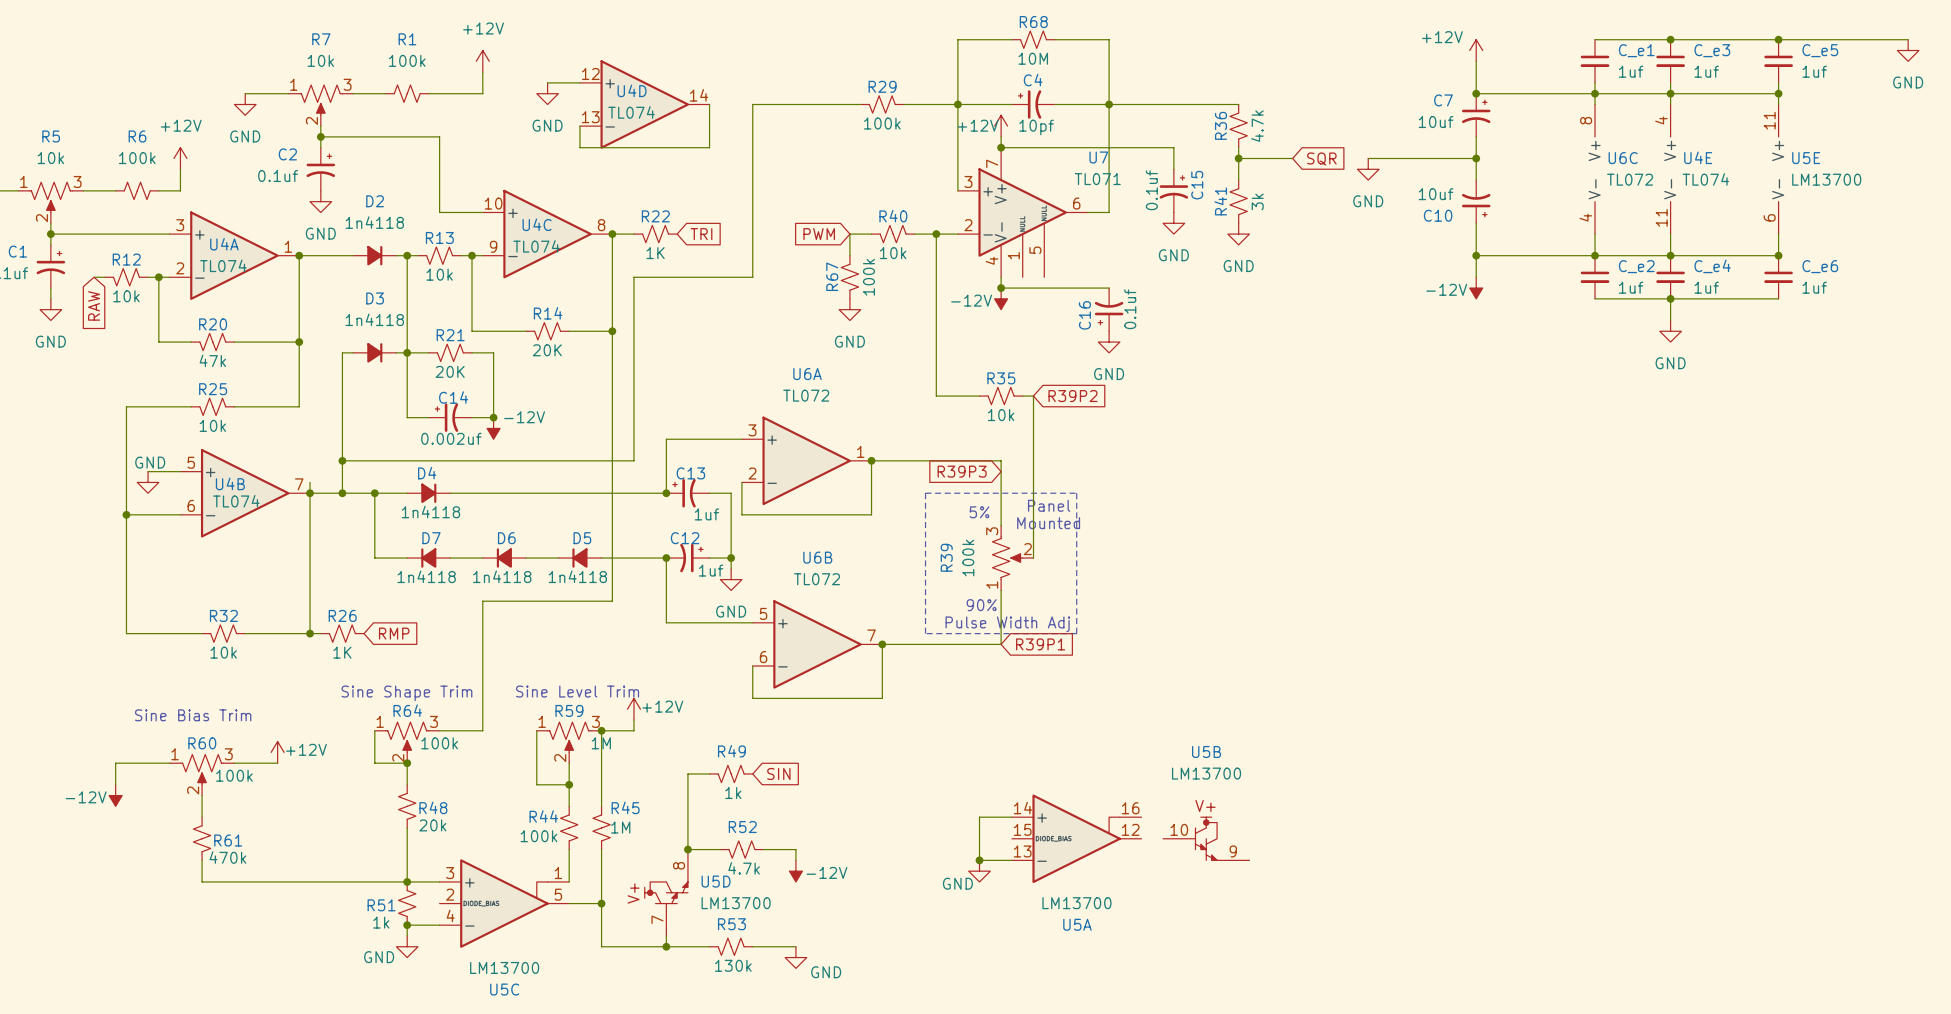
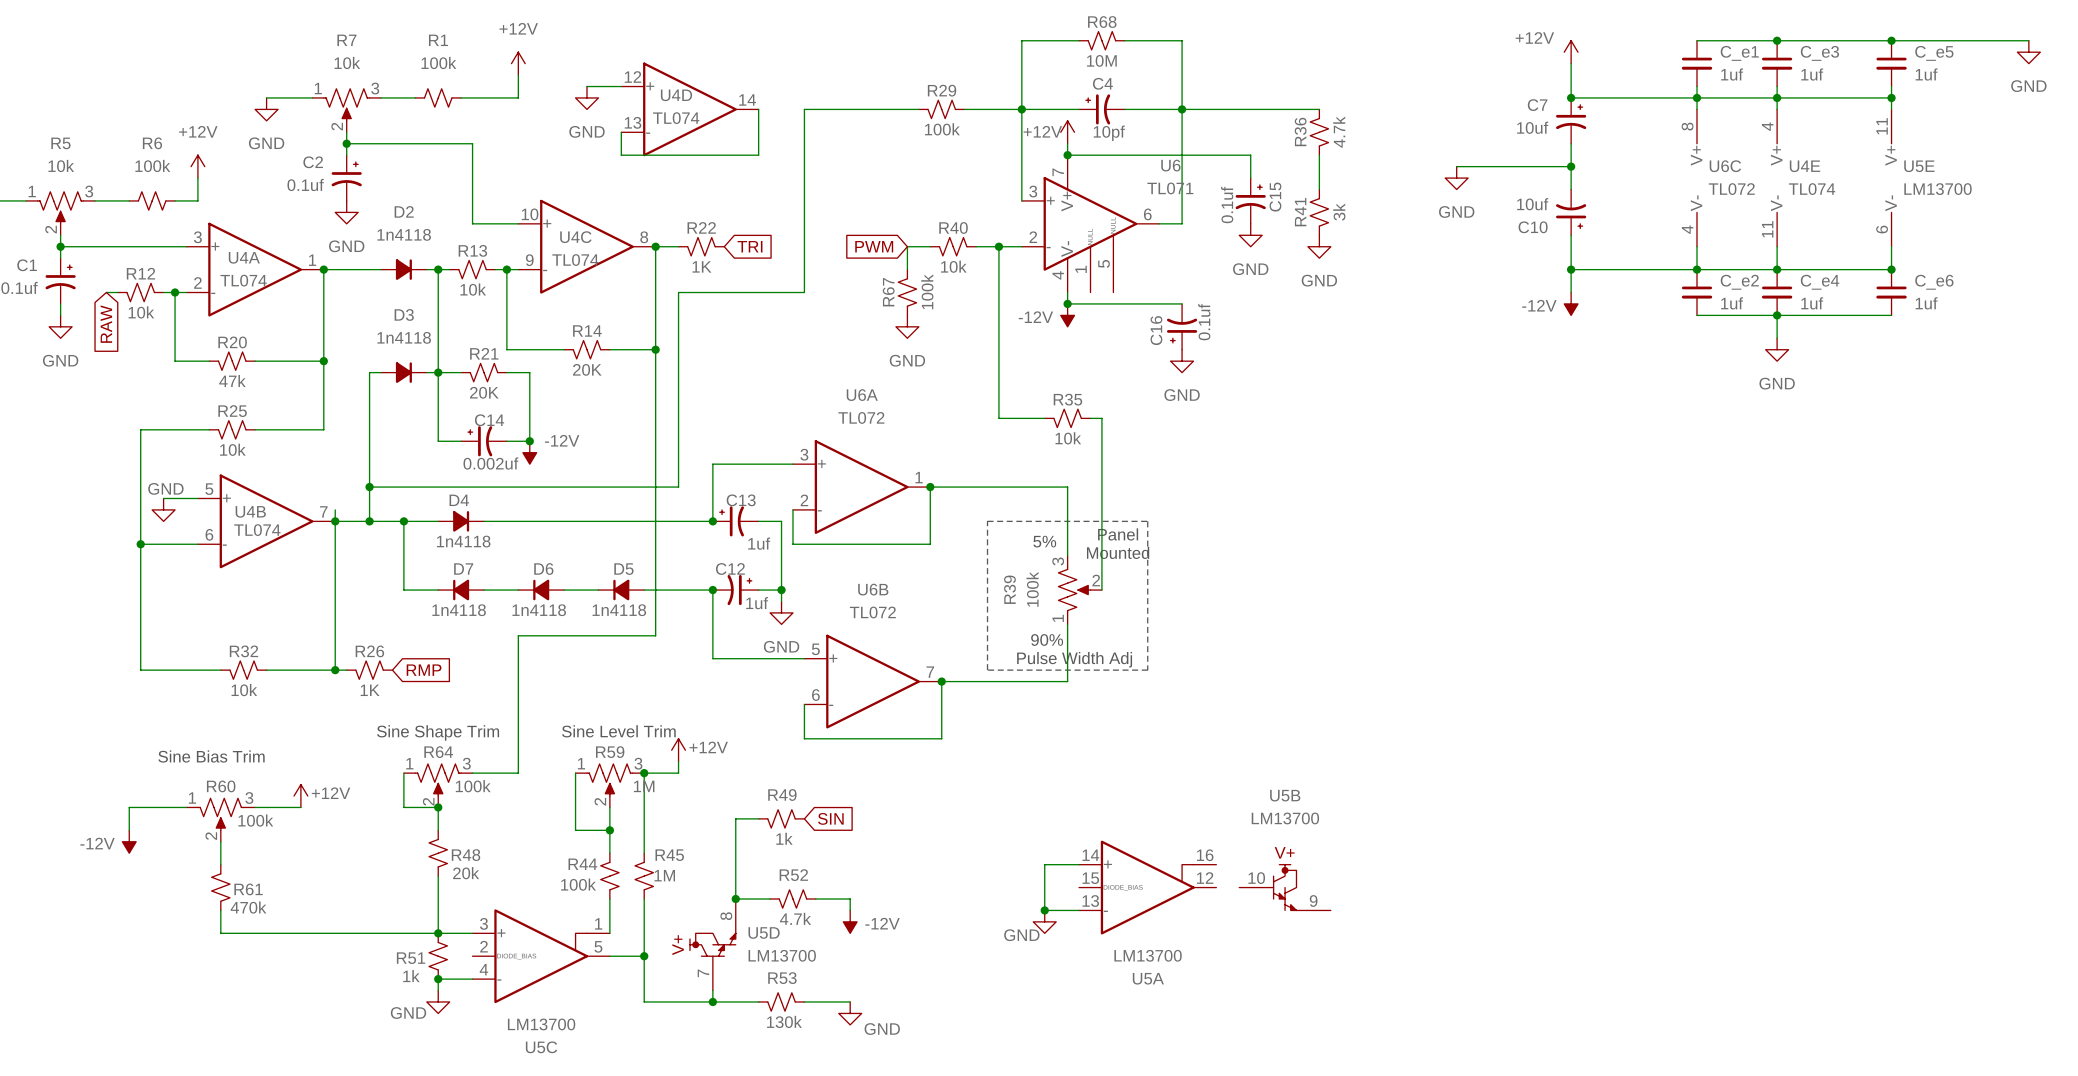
U7 name: U7 (1098, 157) -> U6 (1170, 165)
wire: (1238, 158) (1292, 158) -> none
junction: (1238, 158) -> none
global label: SQR (1321, 159) -> none
global label: R39P2 (1072, 396) -> none
global label: R39P3 (962, 471) -> none
global label: R39P1 (1040, 644) -> none

